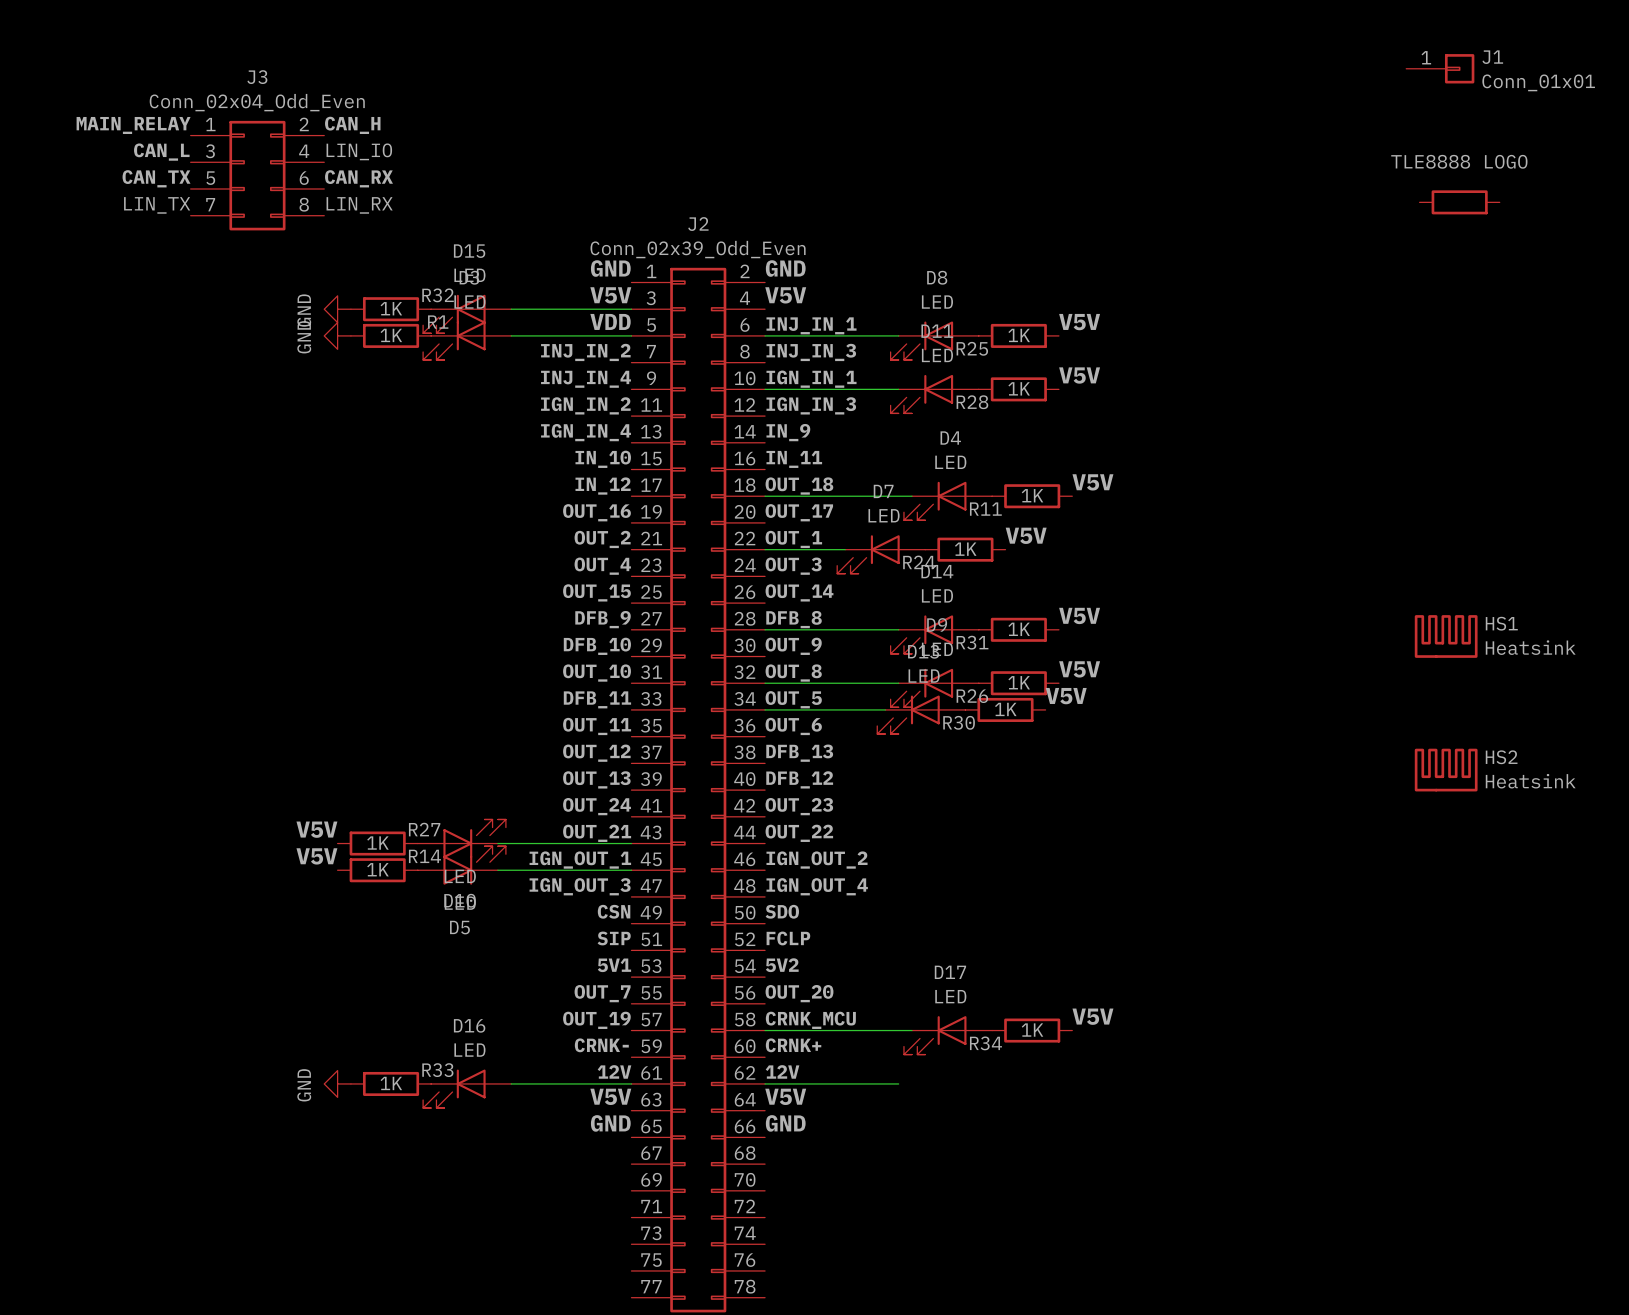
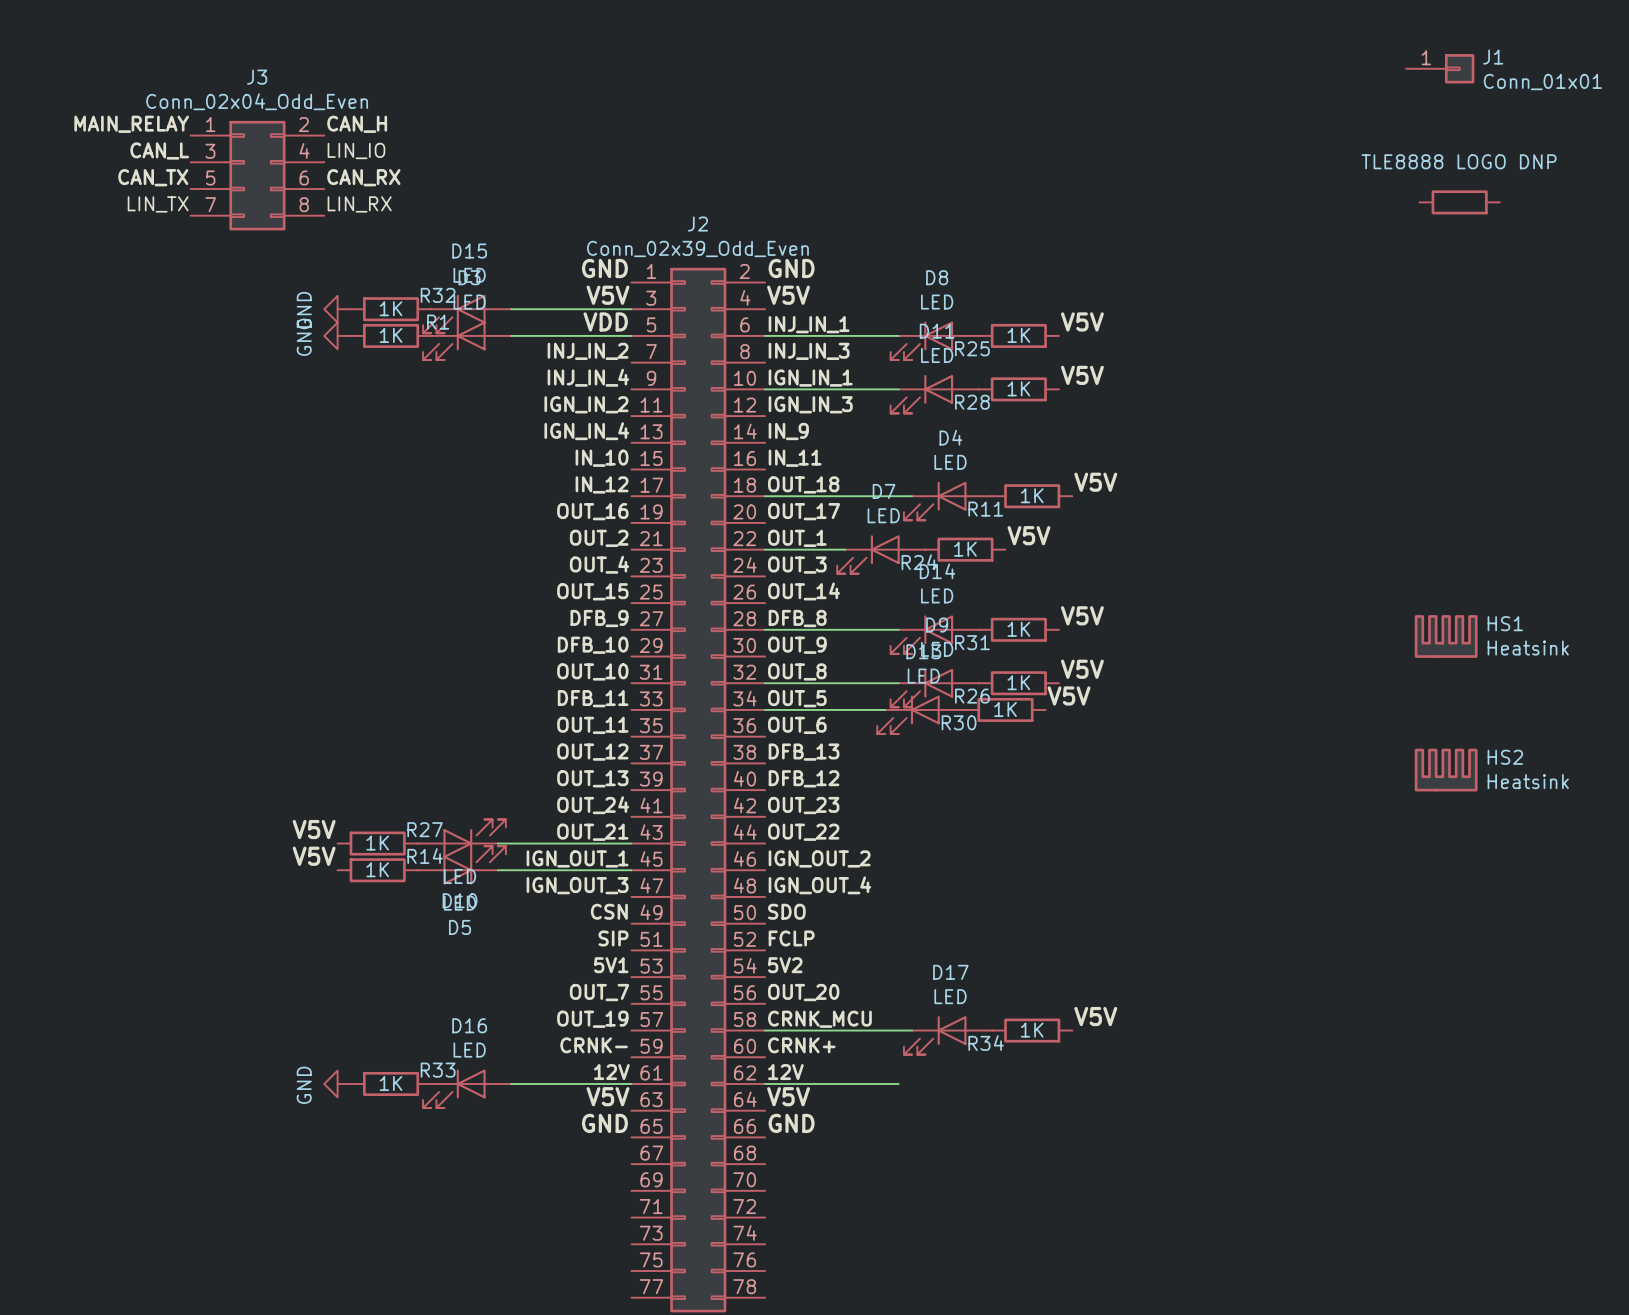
part value: TLE8888 LOGO (1459, 161) -> TLE8888 LOGO DNP (1459, 161)

